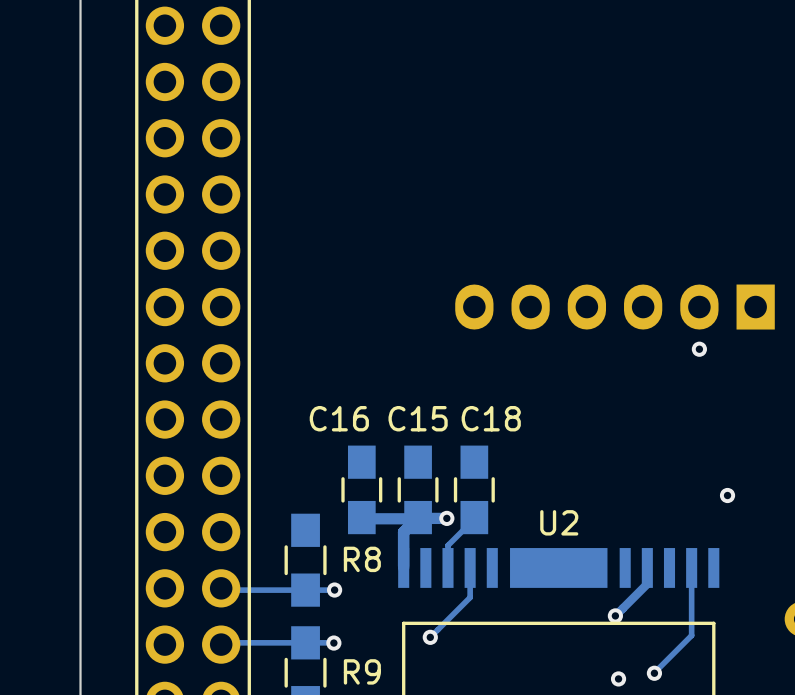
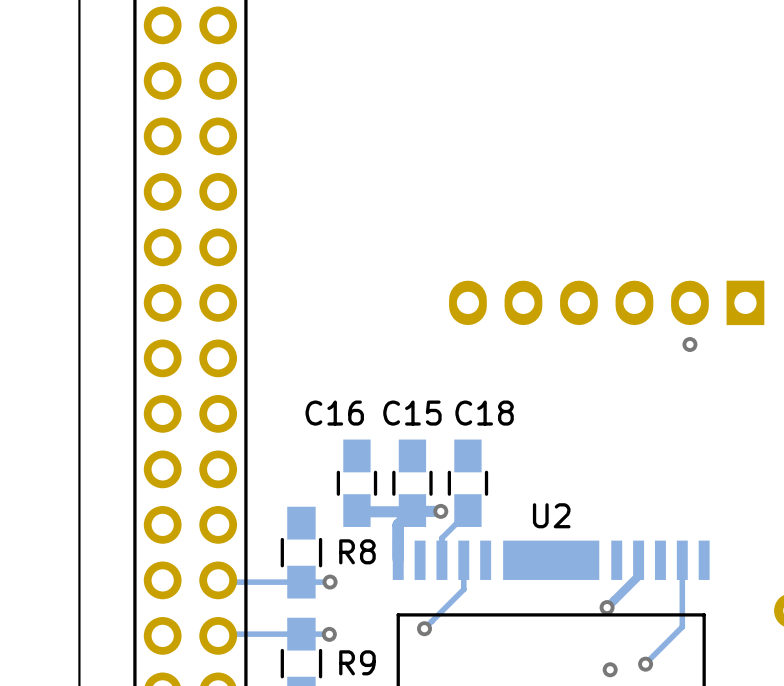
via: (727, 495) -> none

